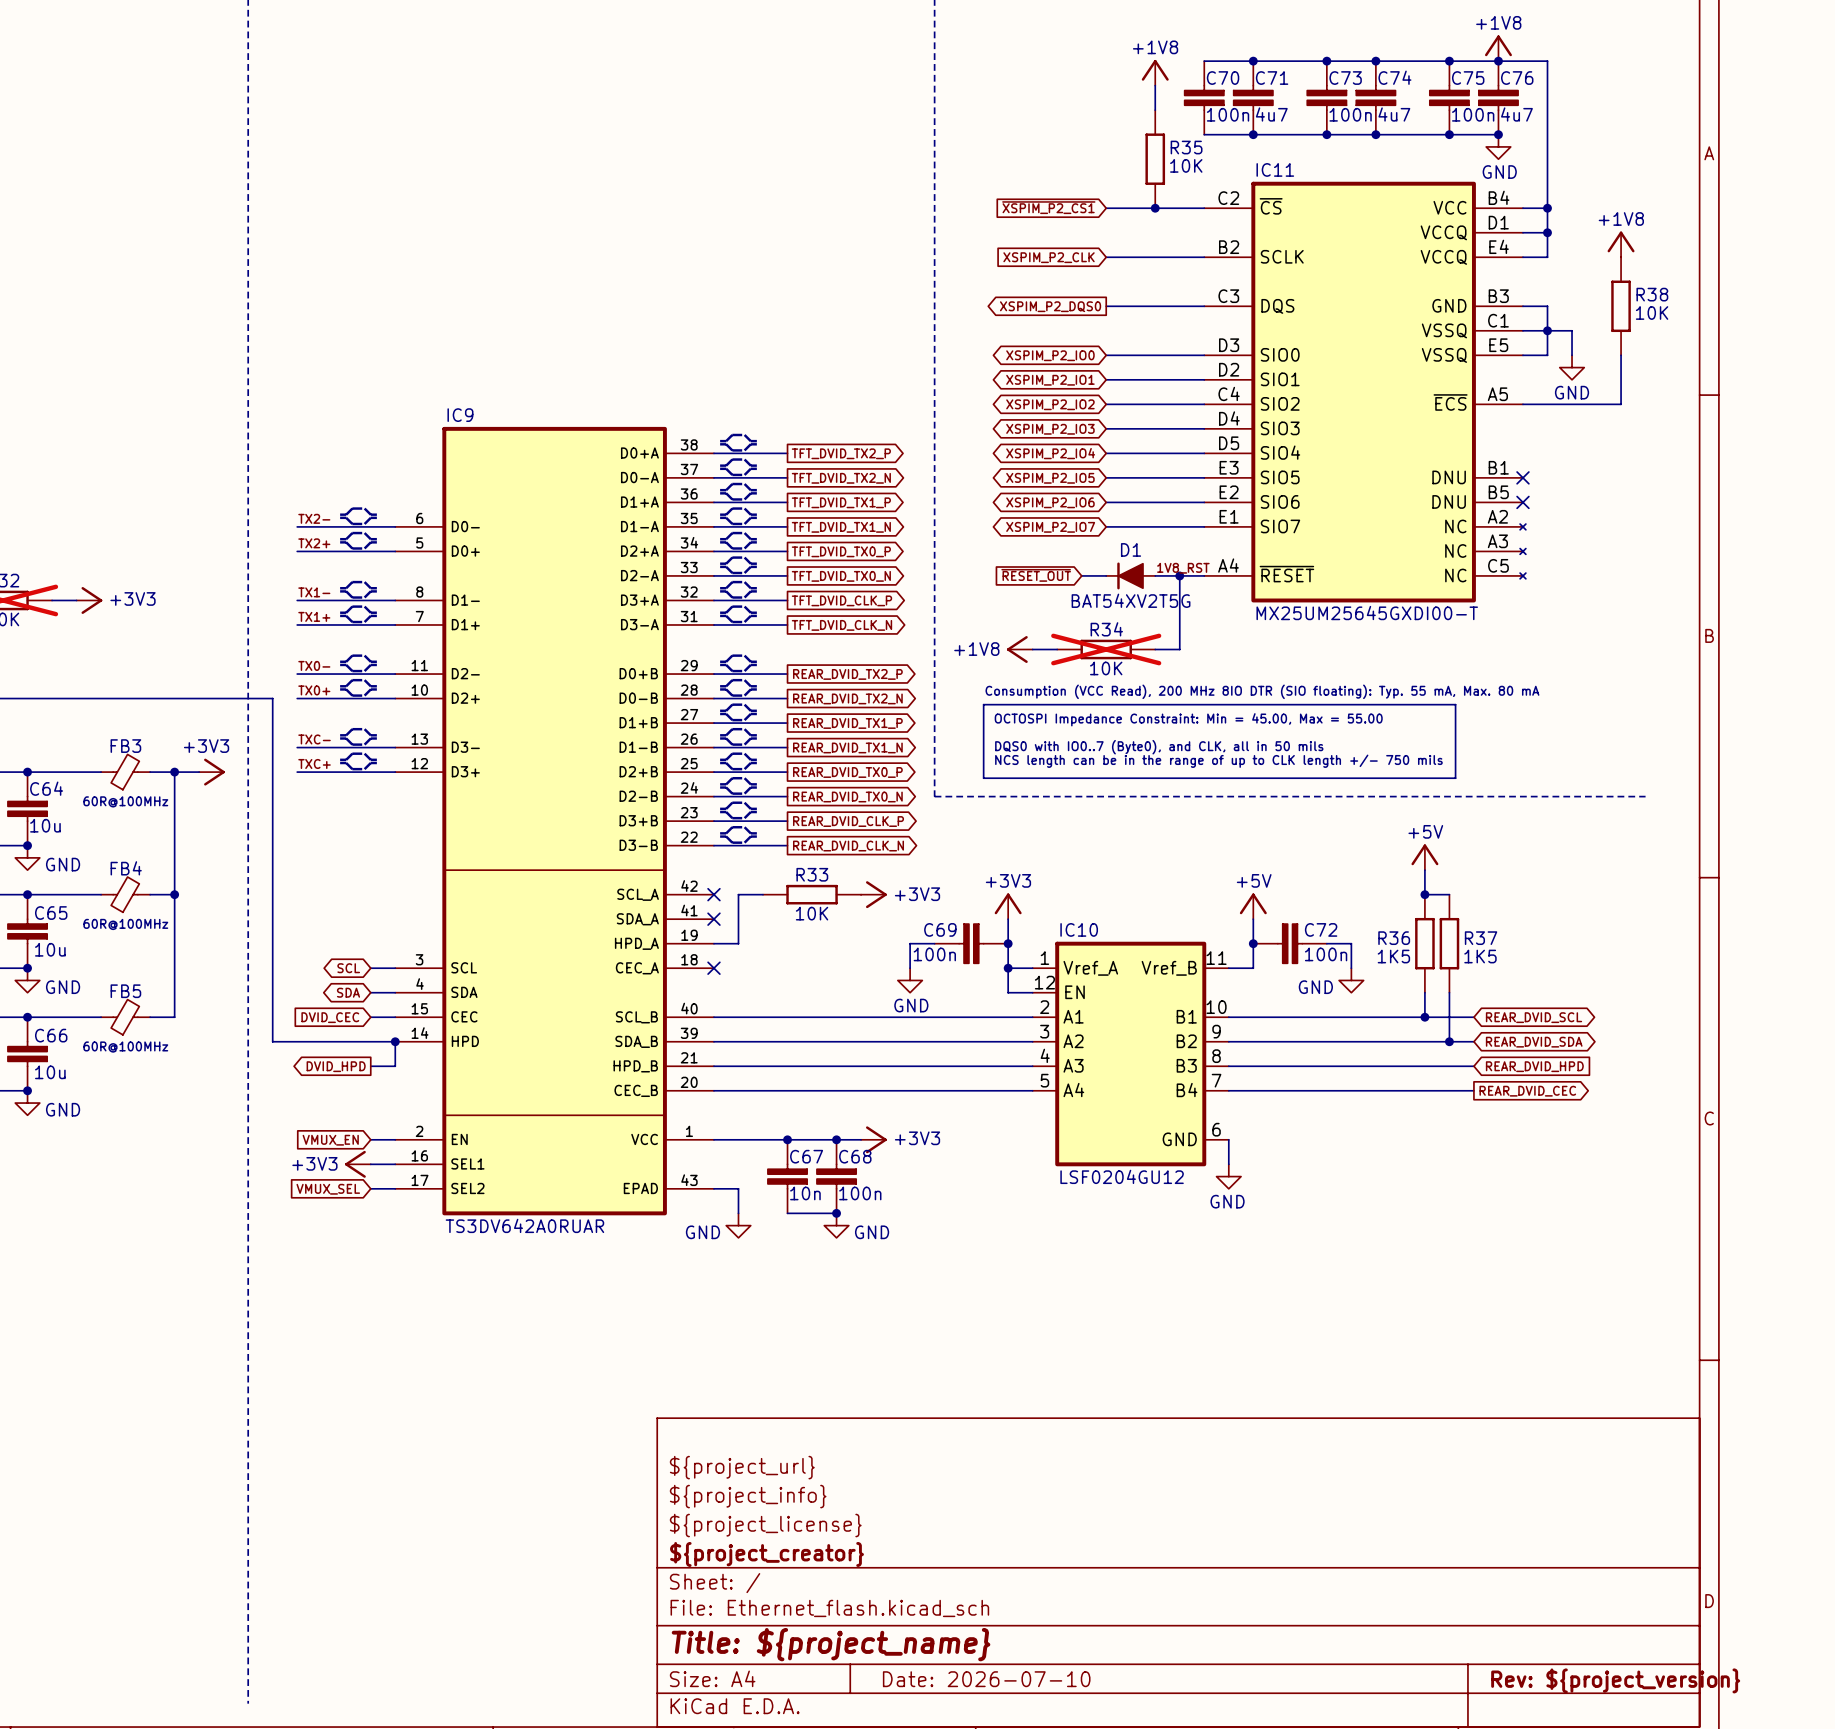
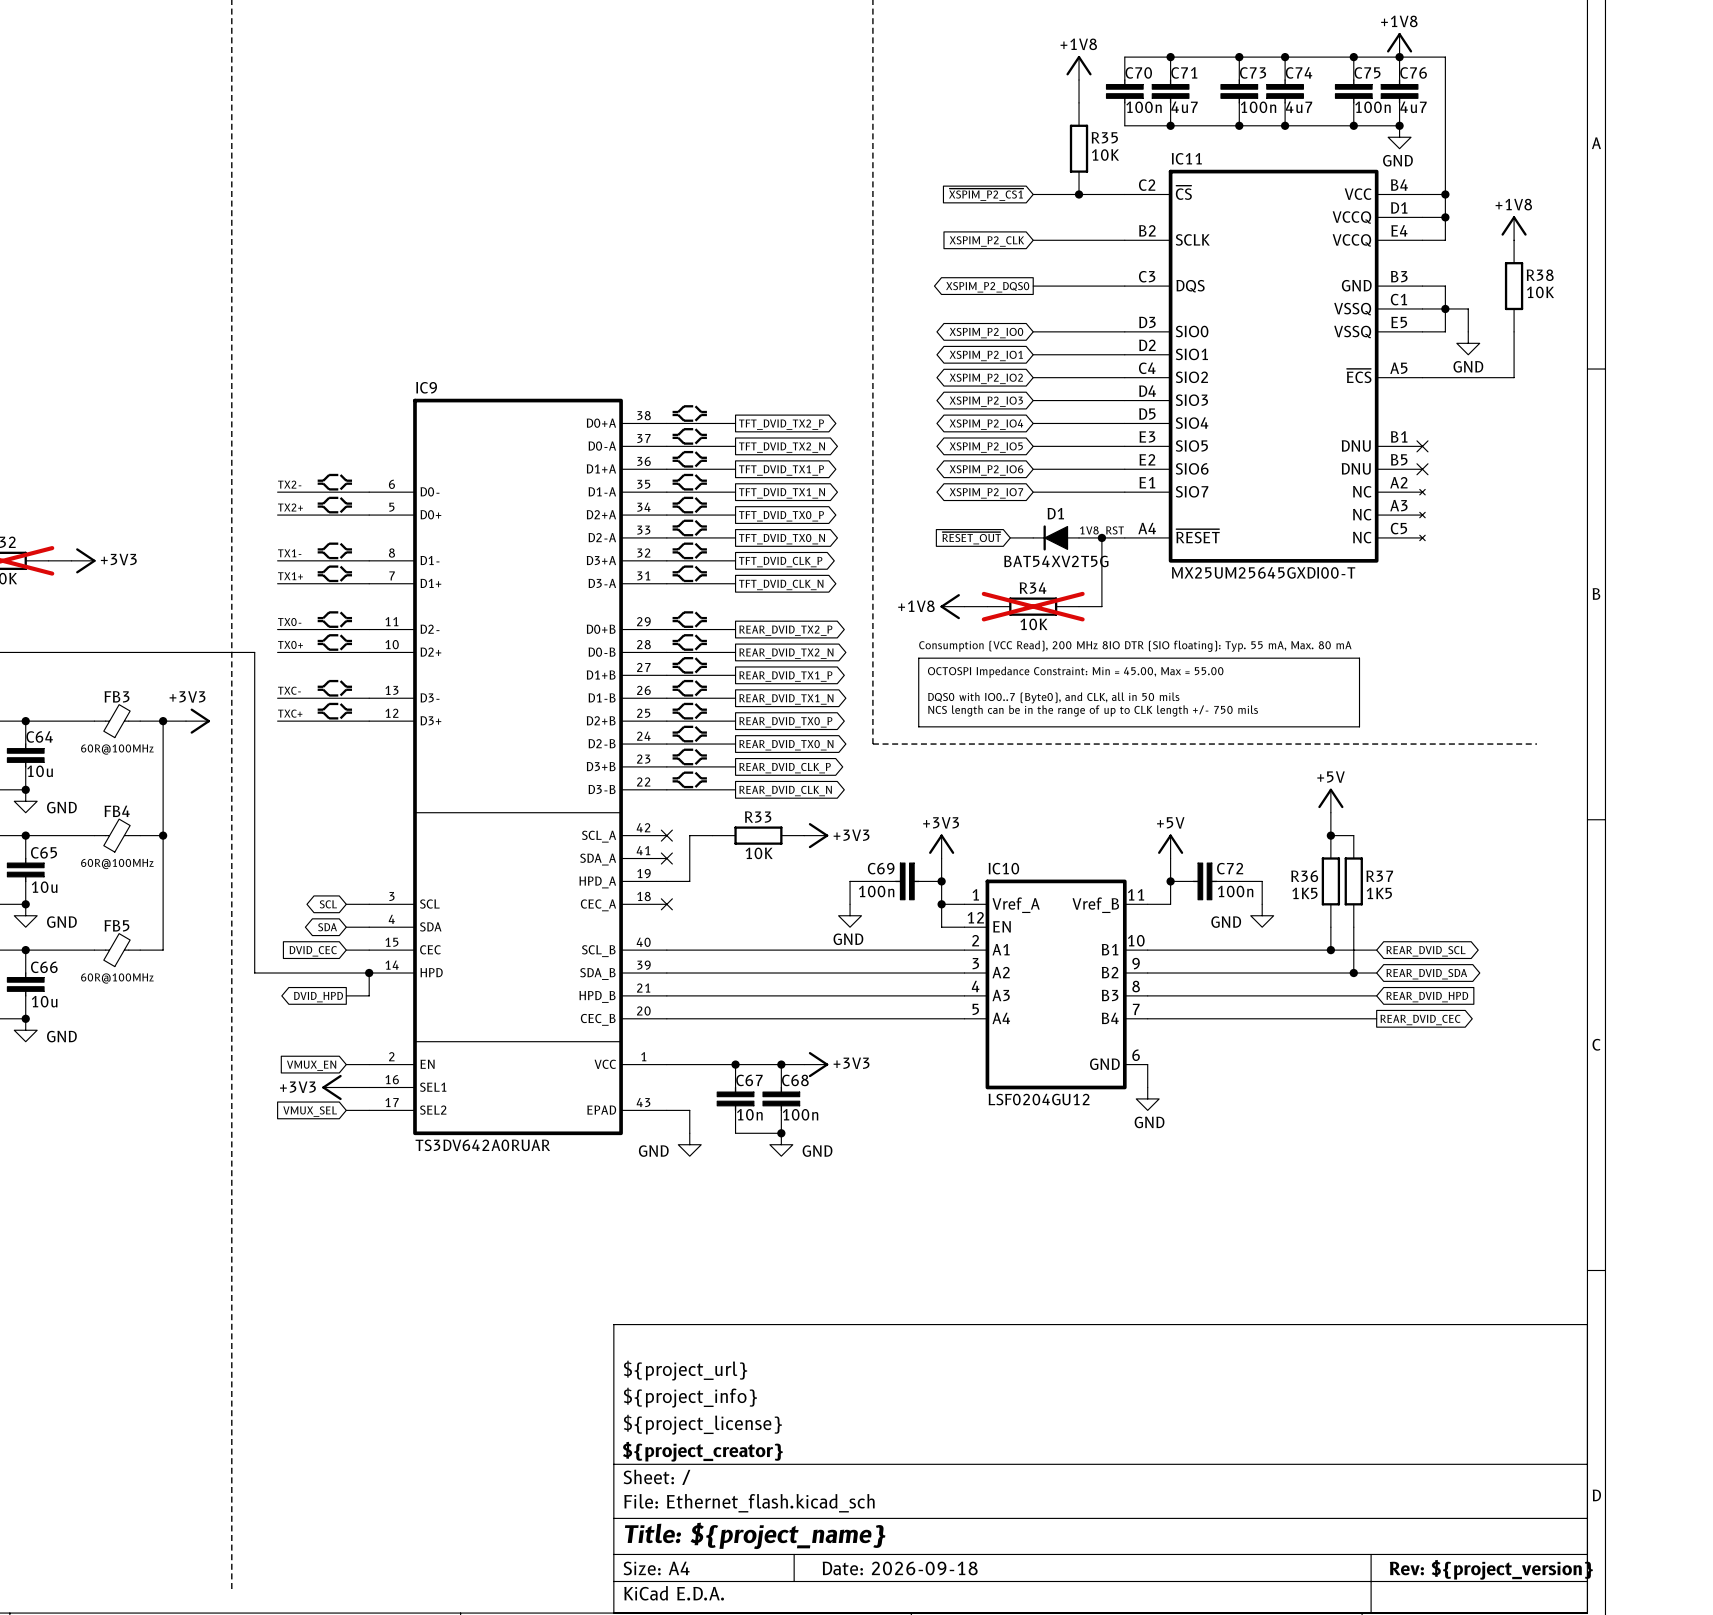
title block: Date: 2026-07-10 (986, 1679) -> Date: 2026-09-18 (900, 1568)

